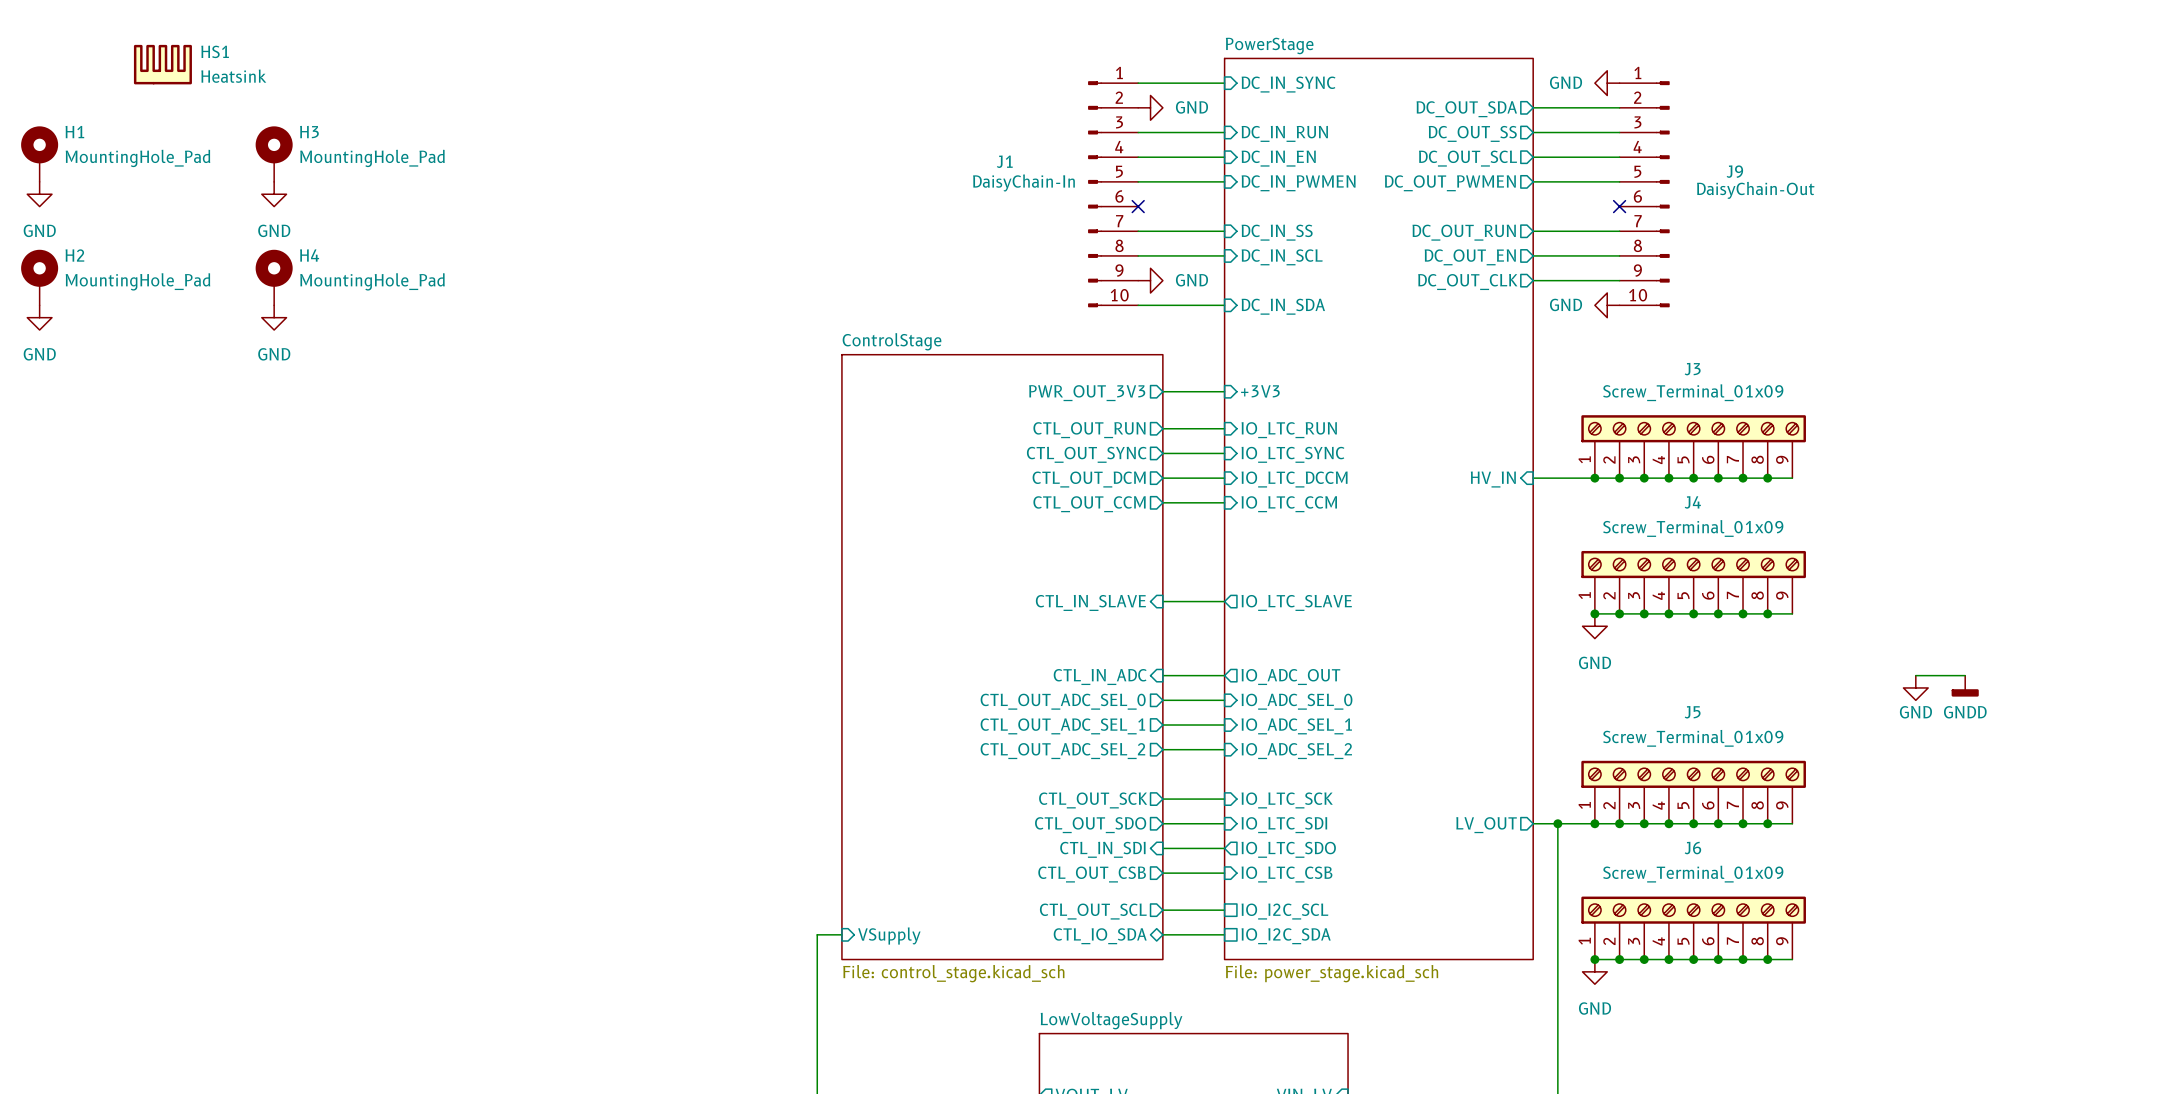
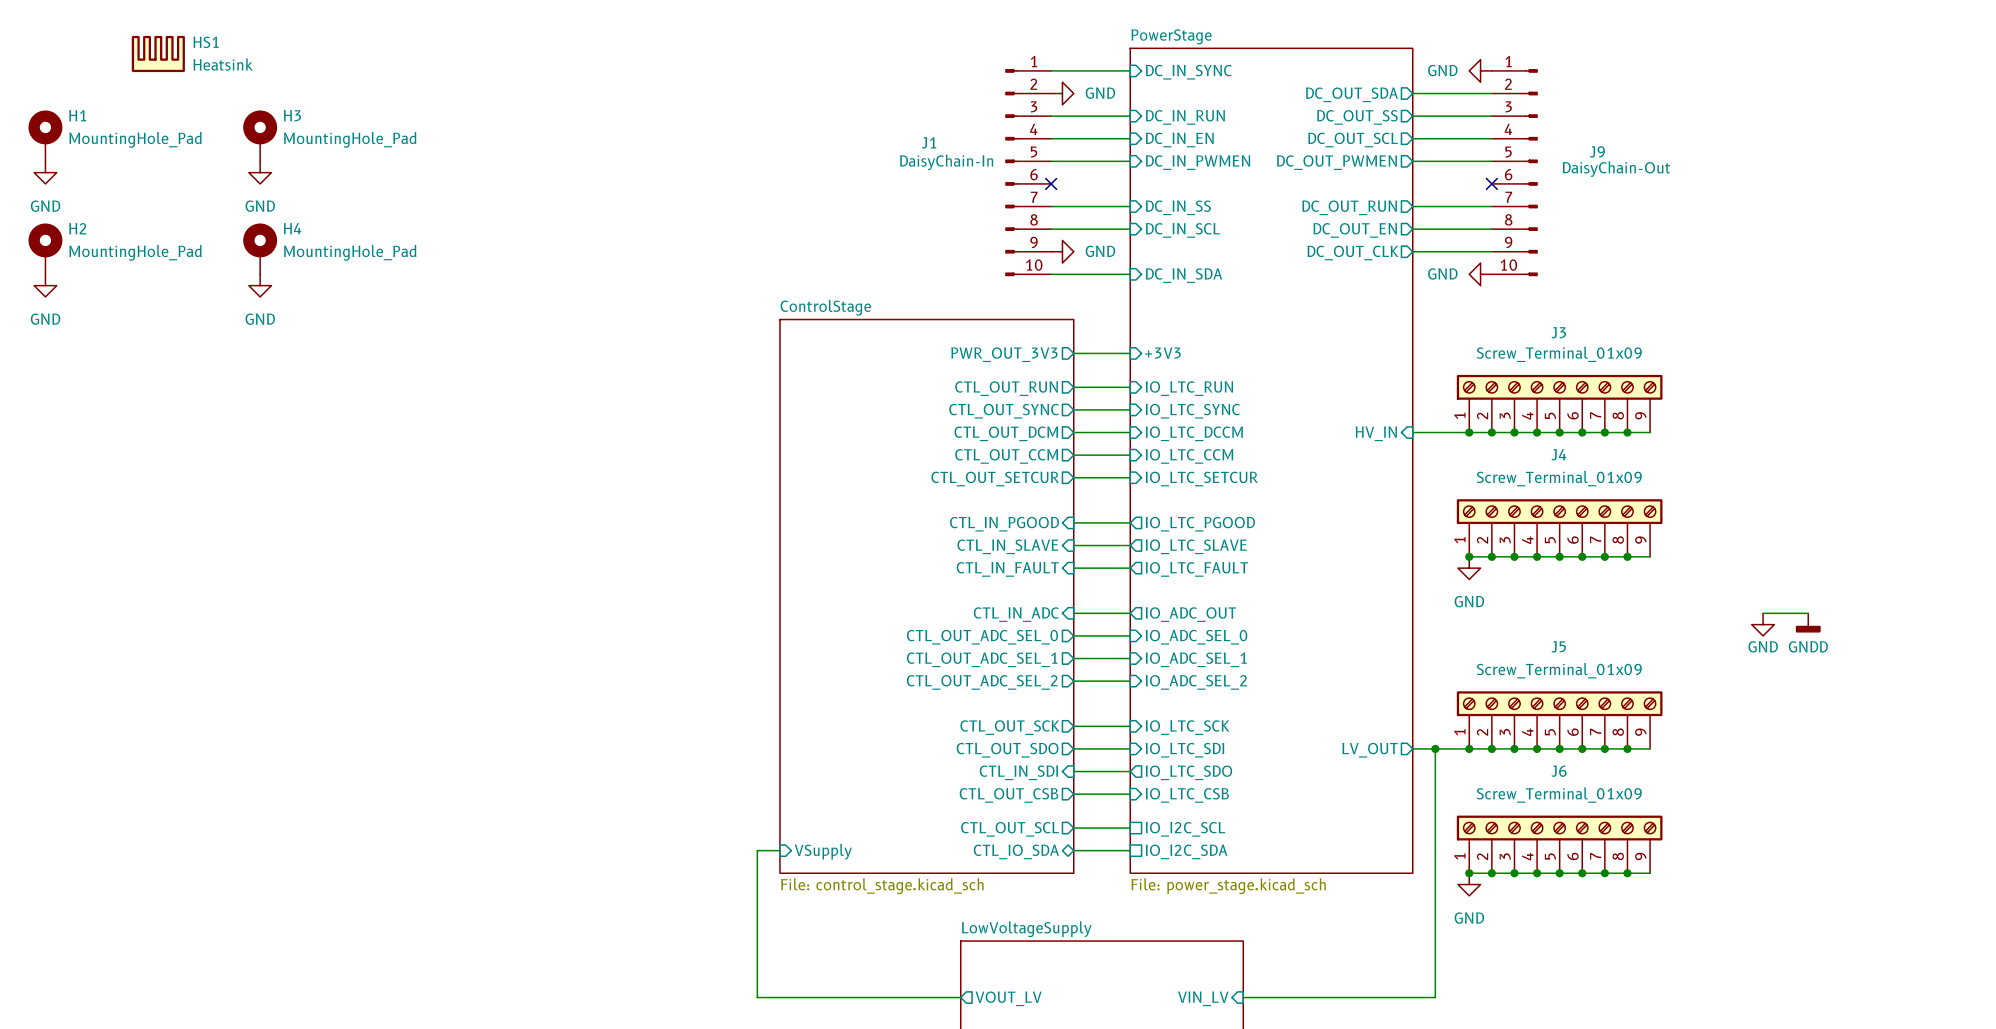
wire: none -> (1073, 477) (1130, 477)
sheet pin: none -> CTL_OUT_SETCUR (995, 479)
sheet pin: none -> IO_LTC_SETCUR (1201, 479)
wire: none -> (1073, 522) (1130, 522)
sheet pin: none -> CTL_IN_PGOOD (1004, 524)
sheet pin: none -> IO_LTC_PGOOD (1200, 524)
wire: none -> (1073, 568) (1130, 568)
sheet pin: none -> CTL_IN_FAULT (1007, 569)
sheet pin: none -> IO_LTC_FAULT (1196, 569)

